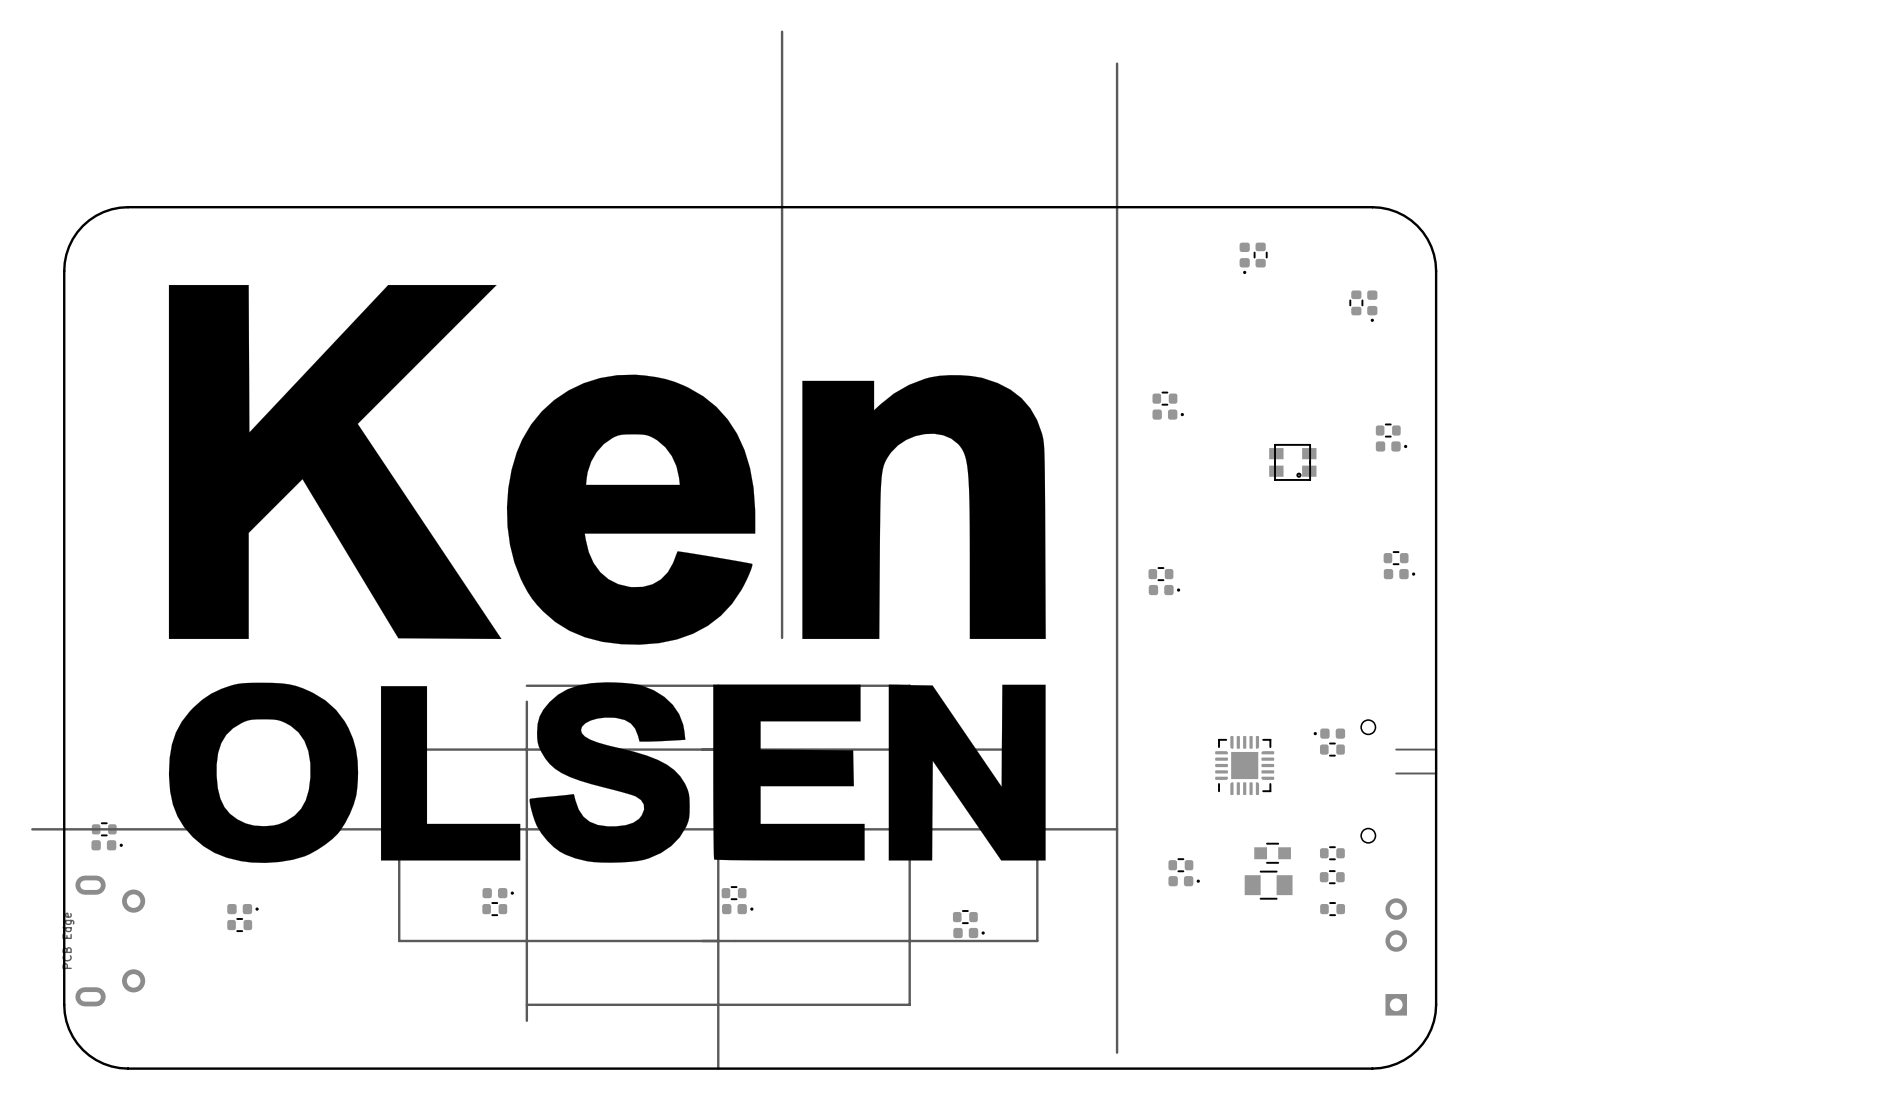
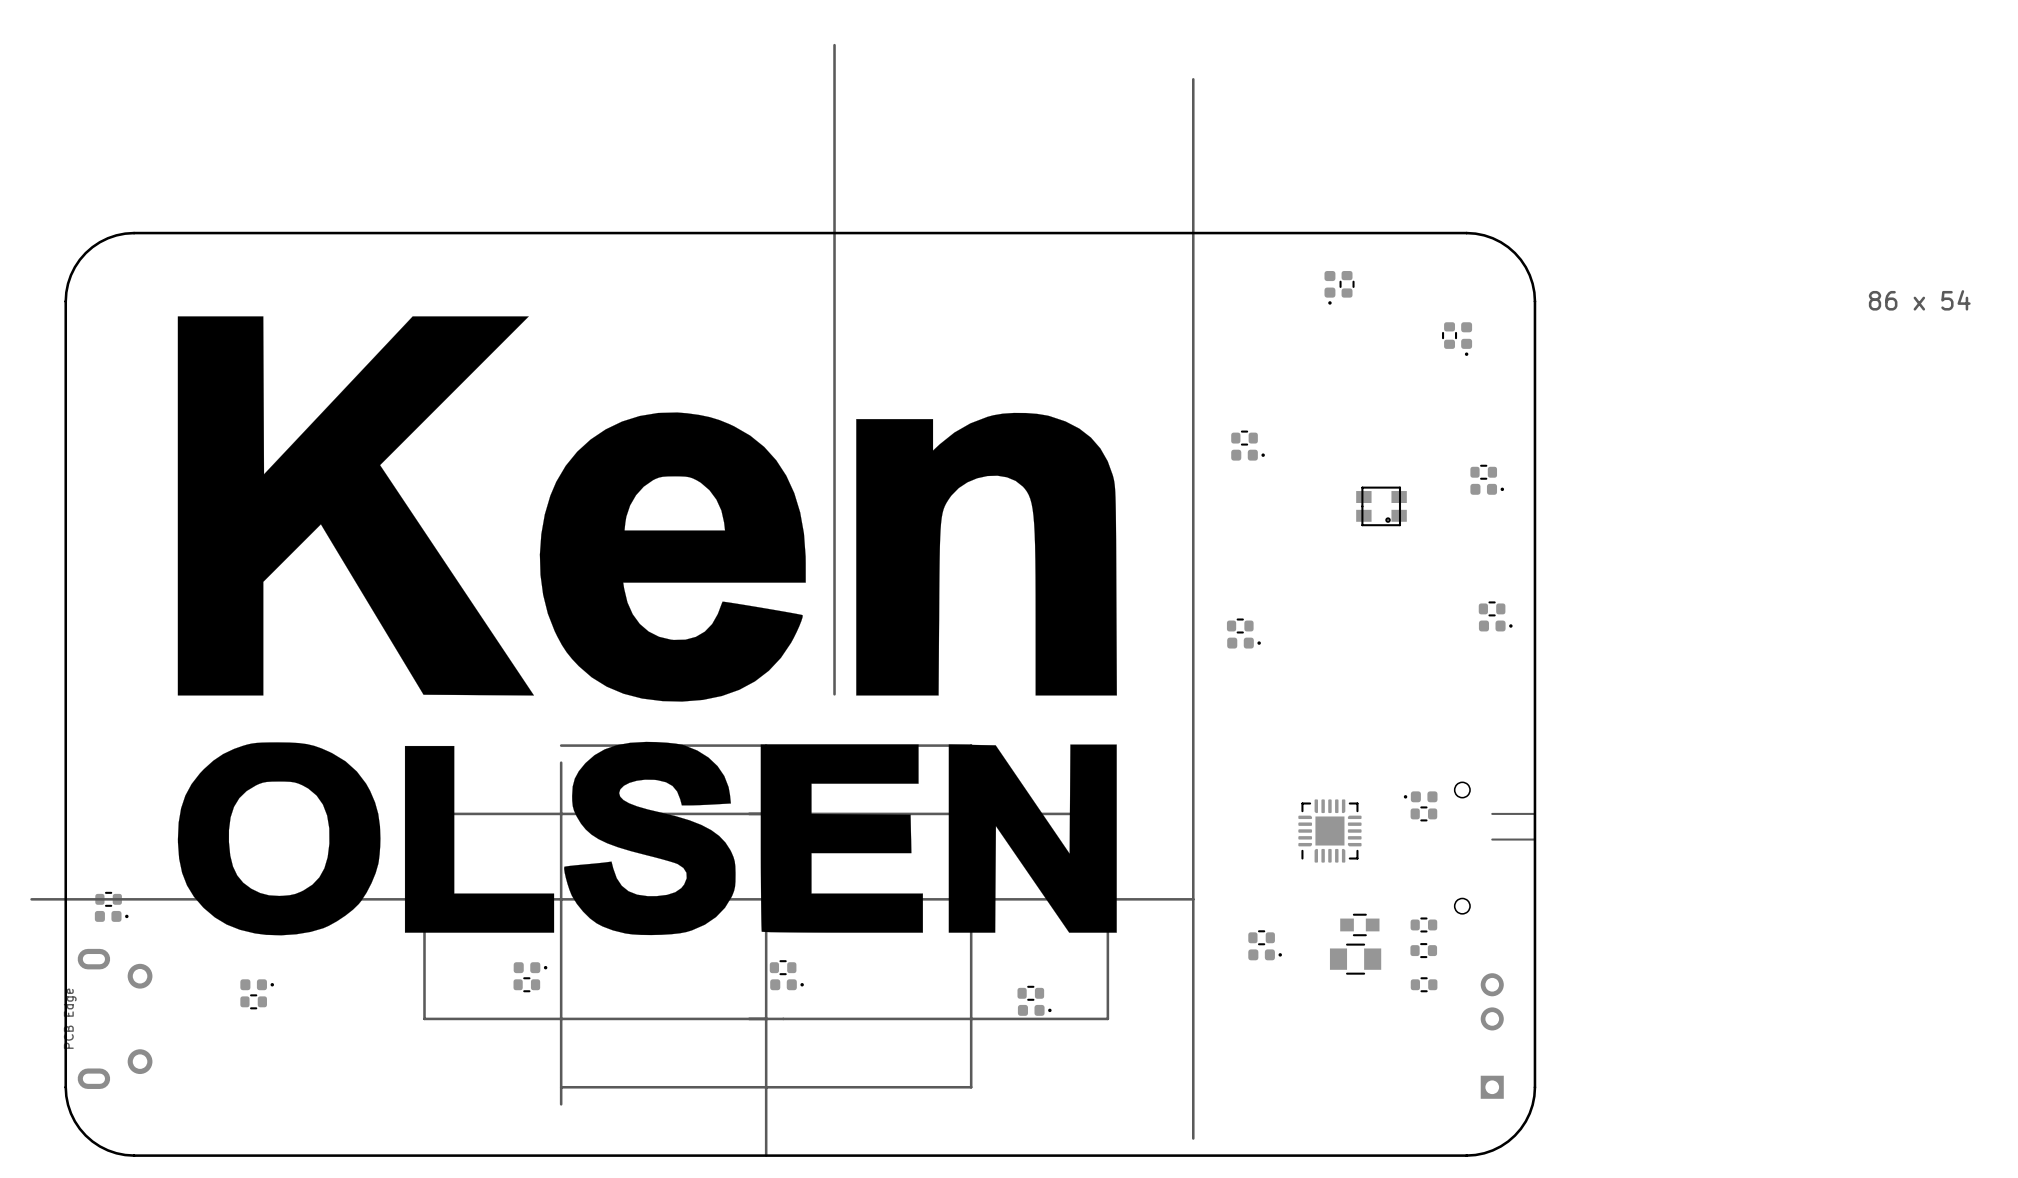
text: none -> 86 x 54 (1919, 300)

